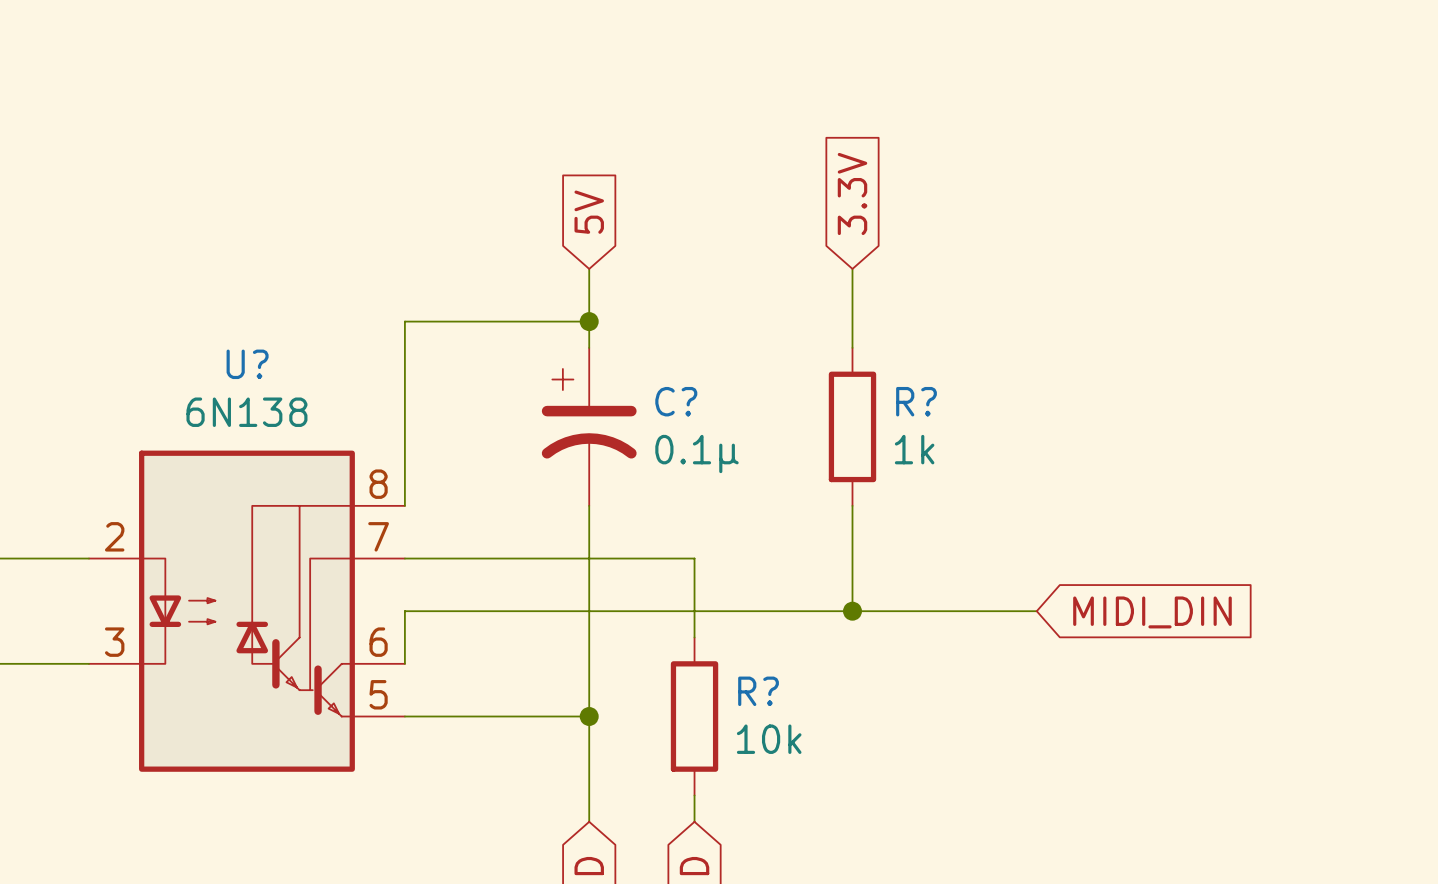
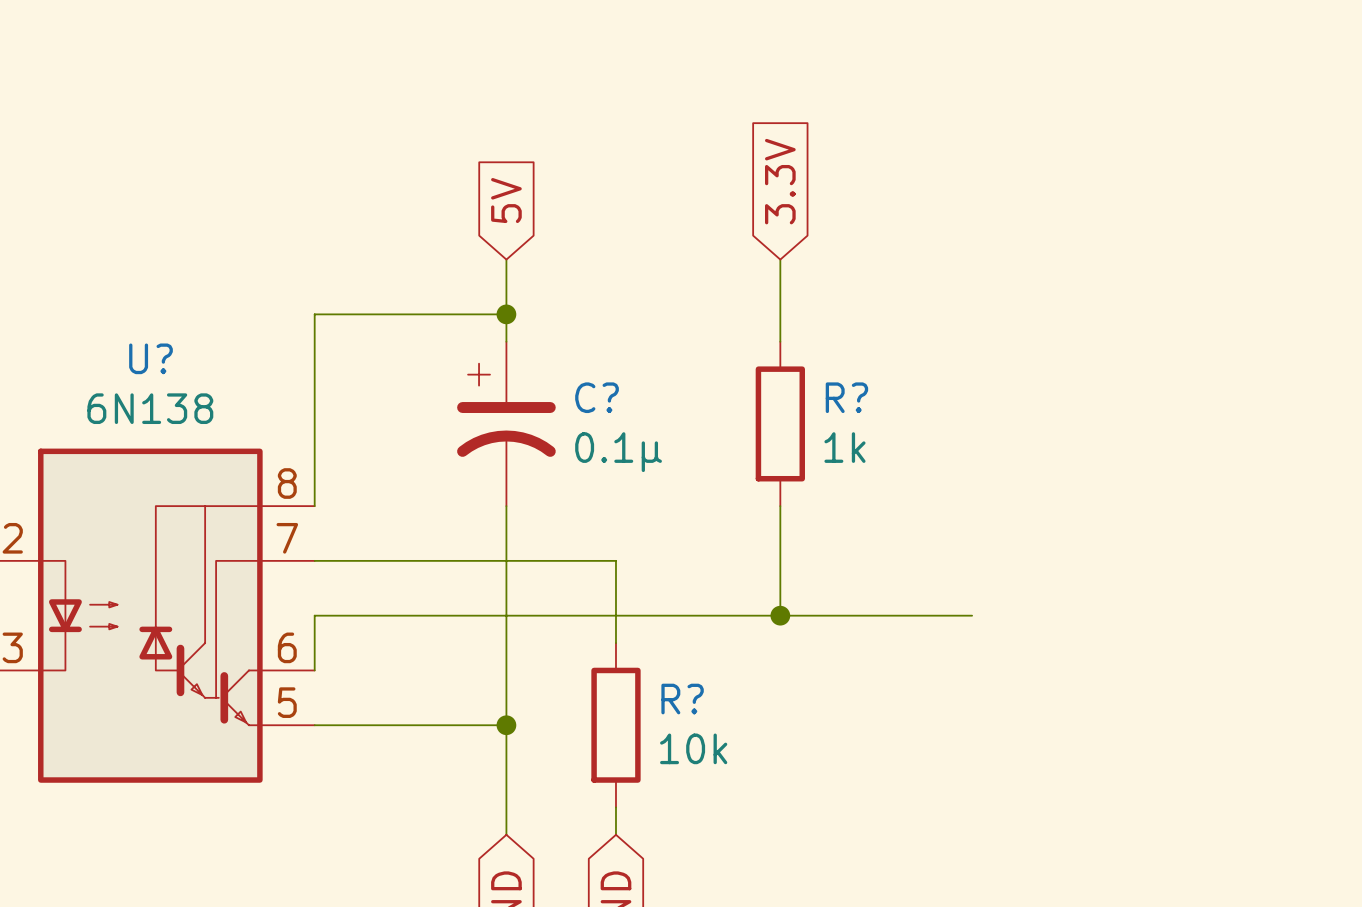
global label: MIDI_DIN (1152, 612) -> none

